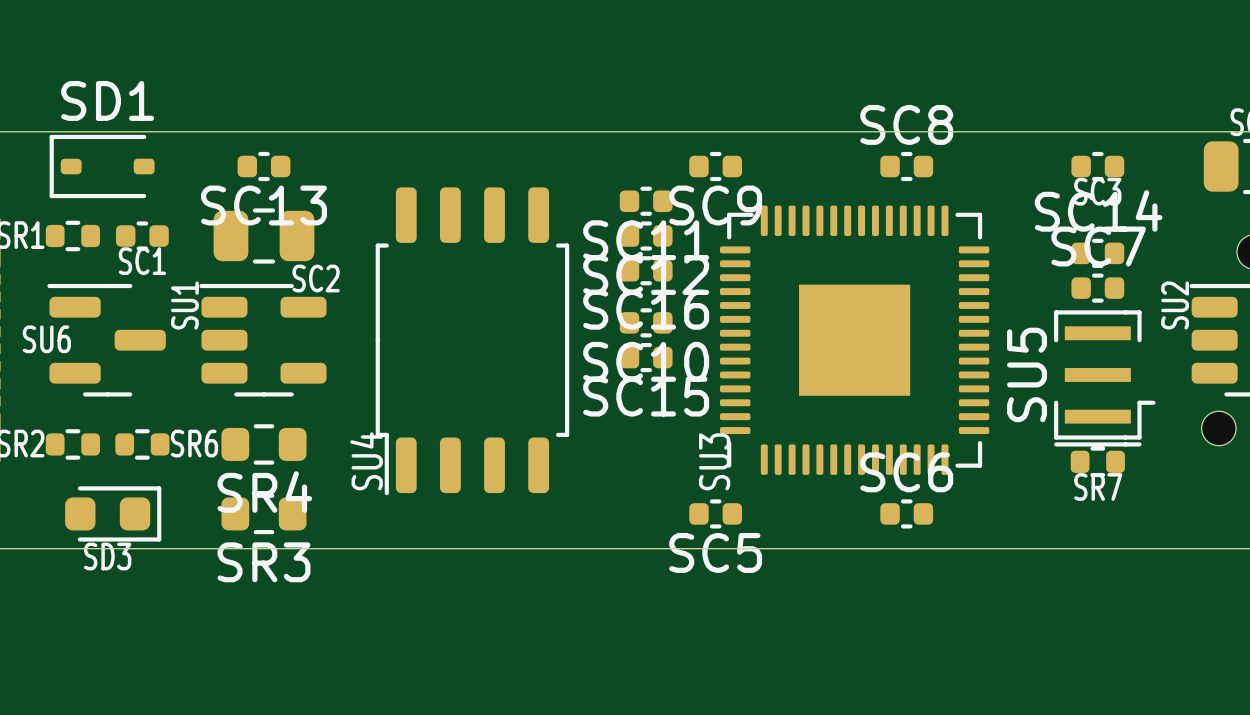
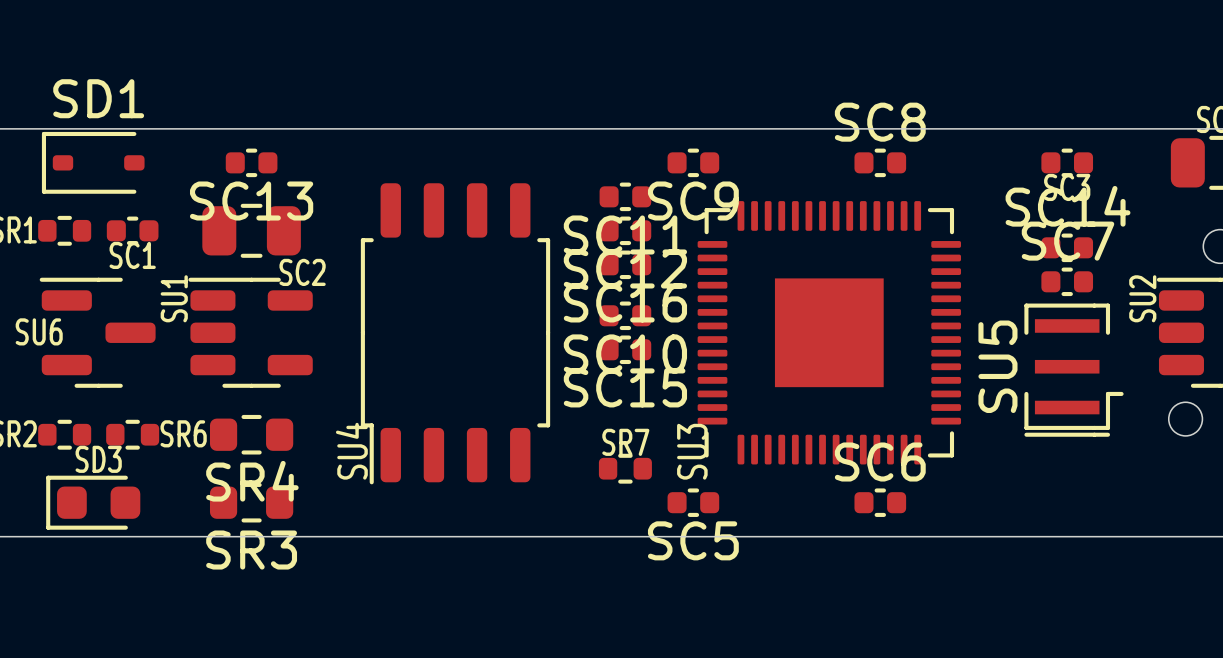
SR7 position: (1097, 461) -> (625, 468)
SR7 name position: SR7 (1098, 486) -> SR7 (625, 442)
SD3 rotation: 0° (113, 513) -> 180° (93, 502)

